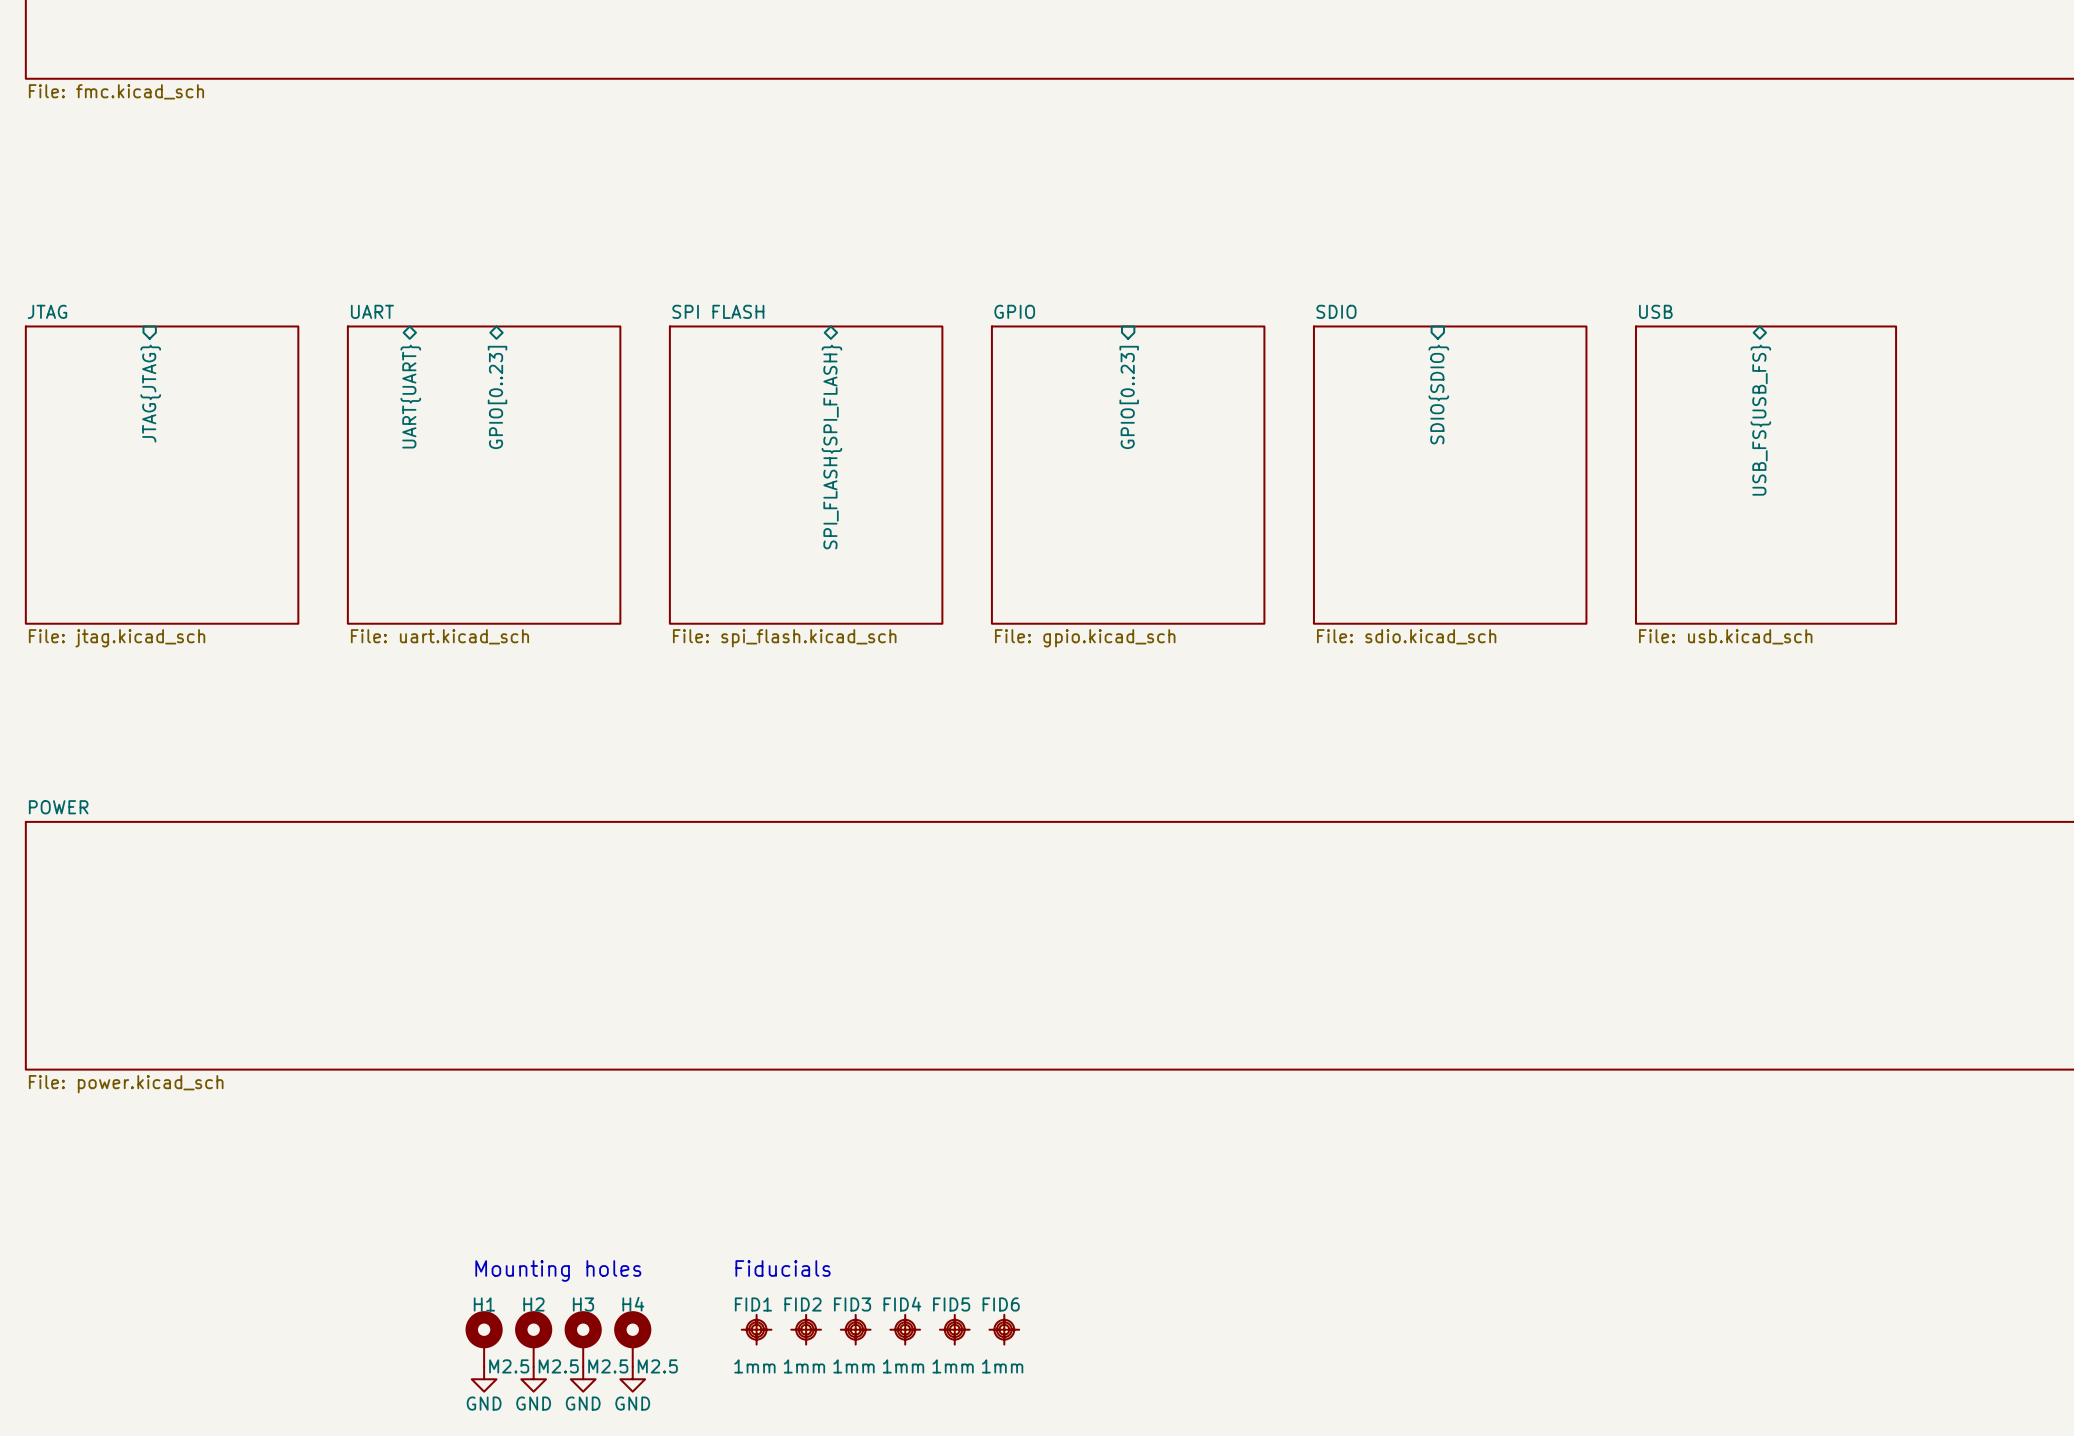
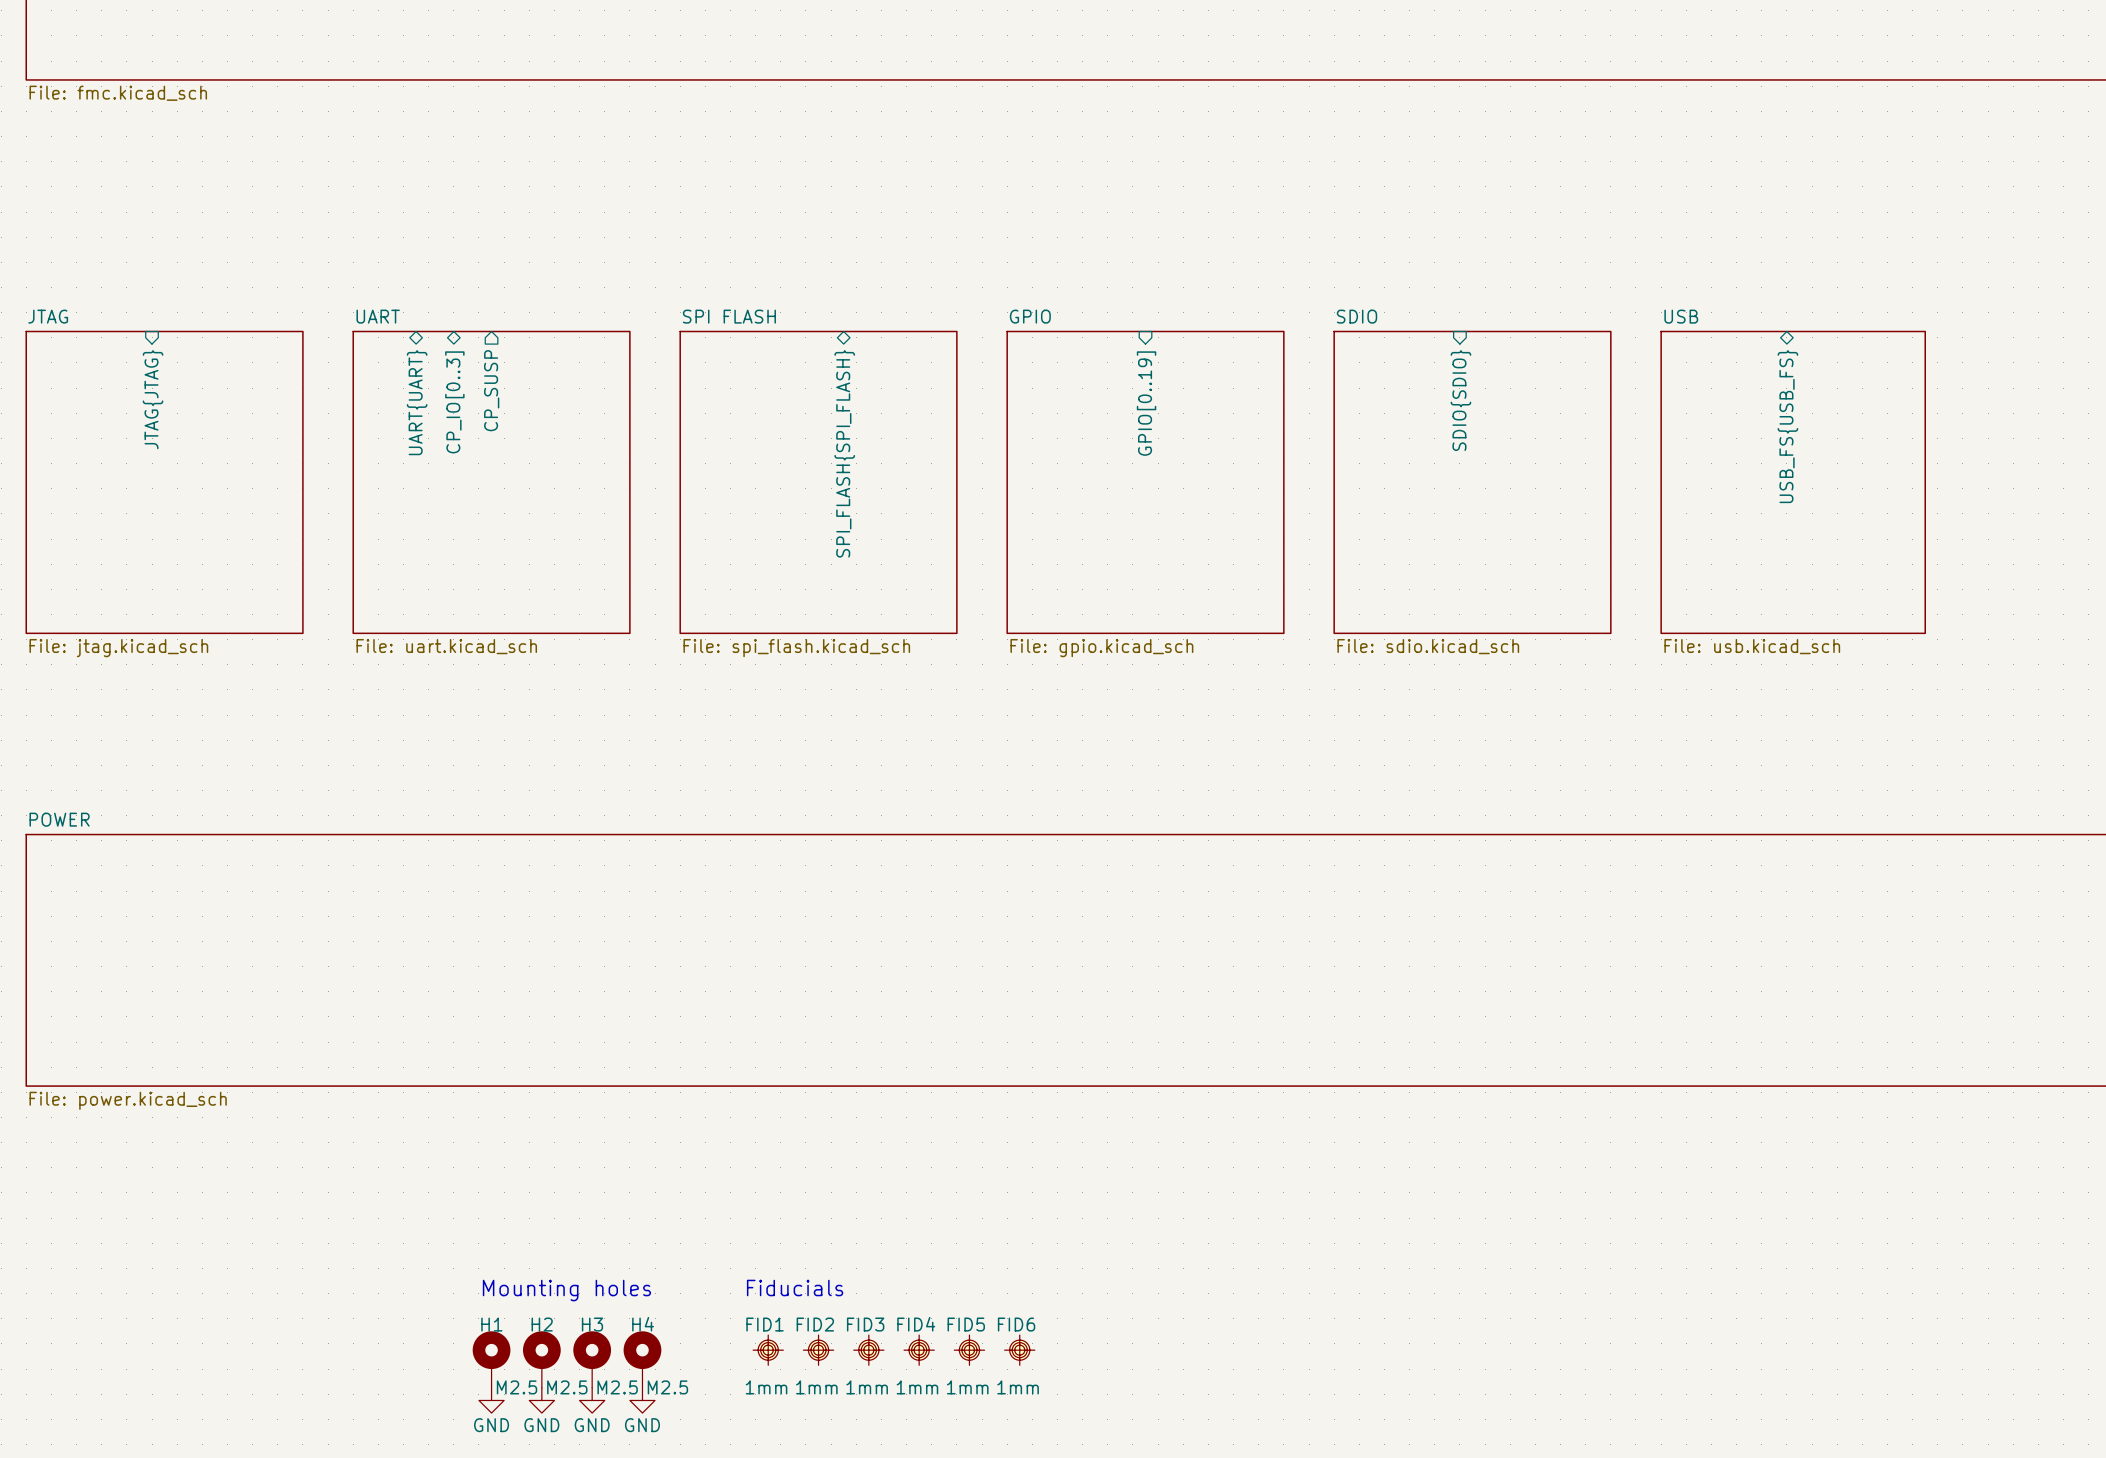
sheet pin: none -> CP_SUSP (491, 390)
sheet pin: none -> CP_IO[0..3] (454, 402)
sheet pin: GPIO[0..23] (497, 397) -> none
sheet pin: GPIO[0..23] (1129, 397) -> GPIO[0..19] (1146, 403)

